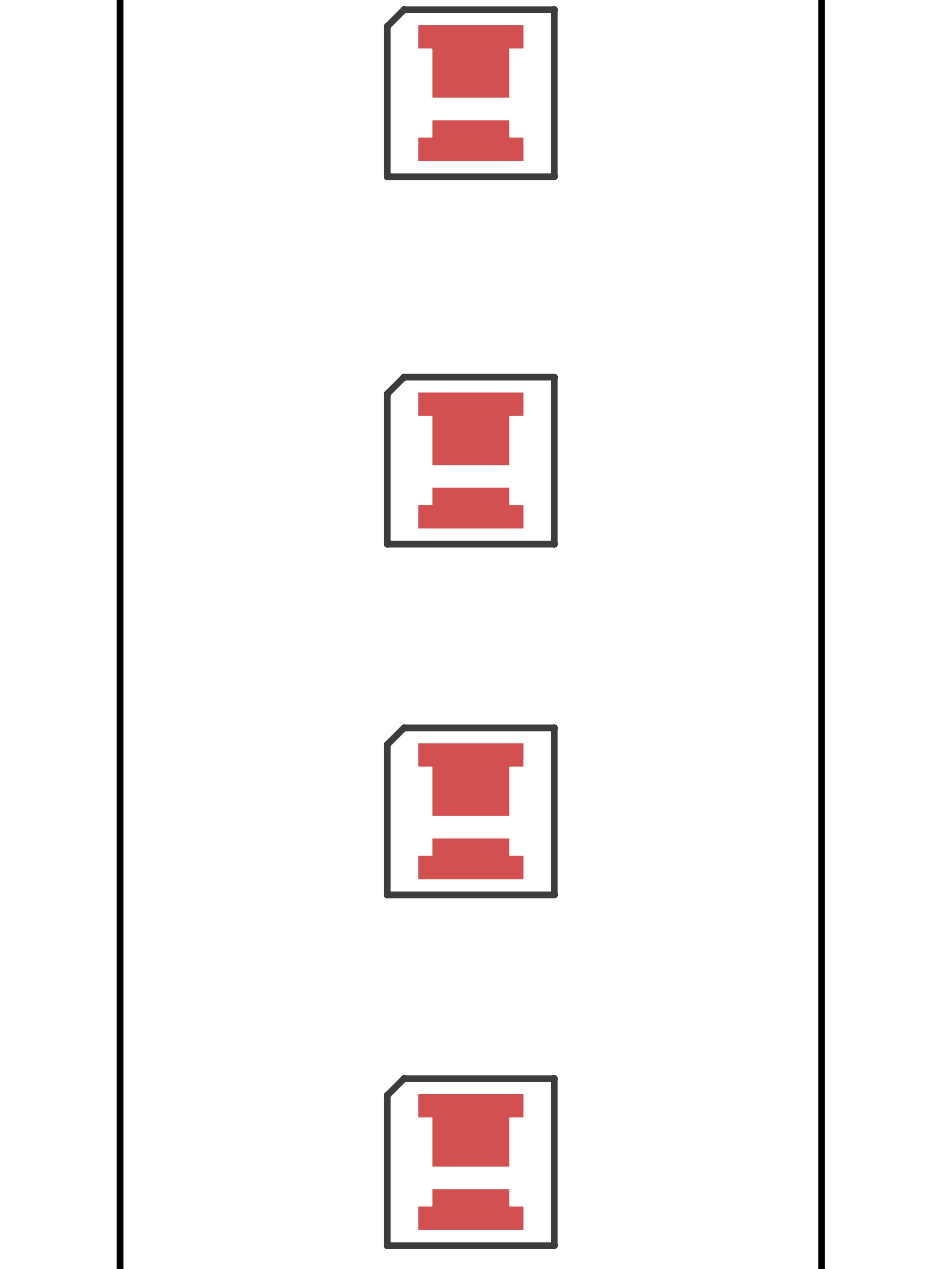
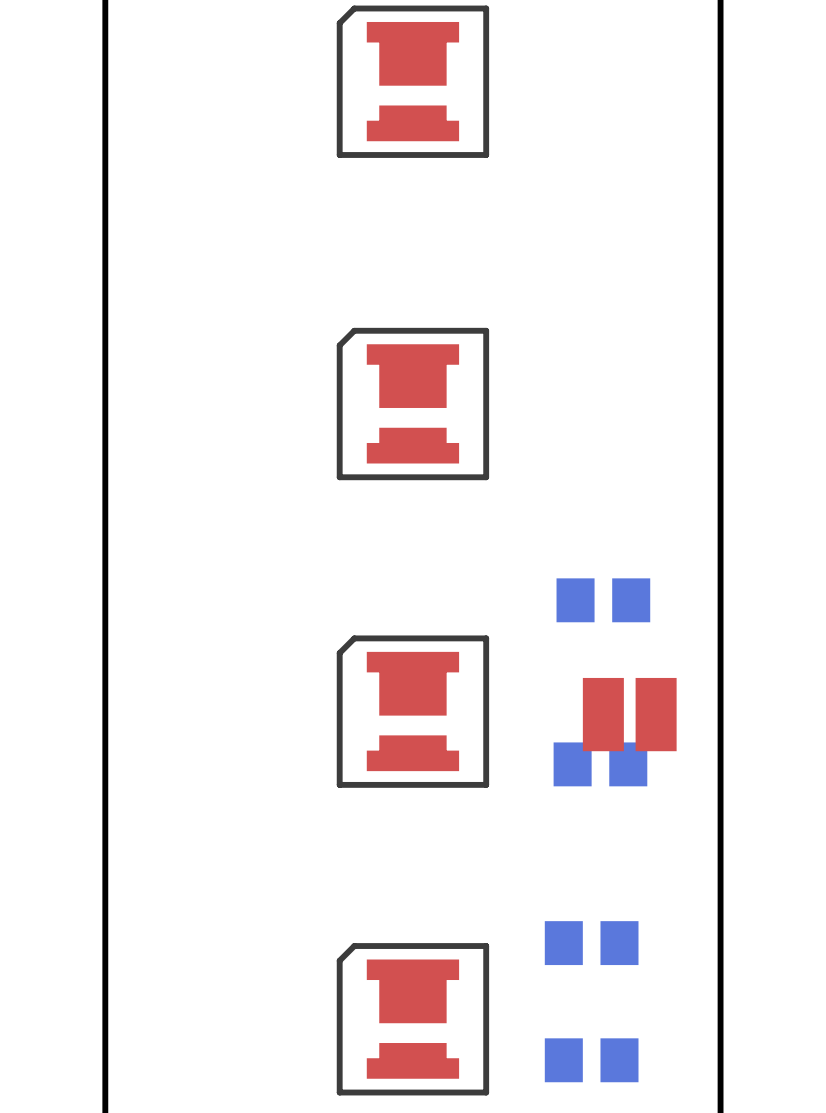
part: none -> (603, 600)
part: none -> (629, 714)
part: none -> (600, 764)
part: none -> (591, 943)
part: none -> (591, 1060)

